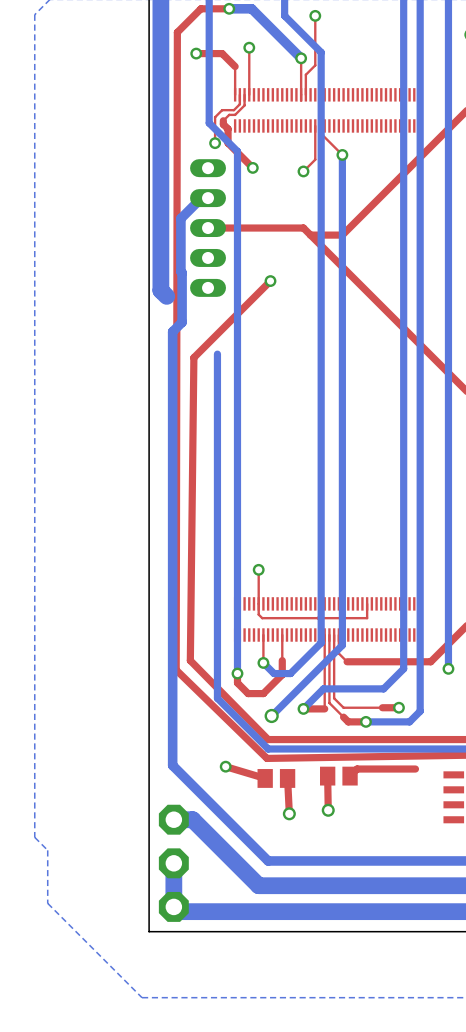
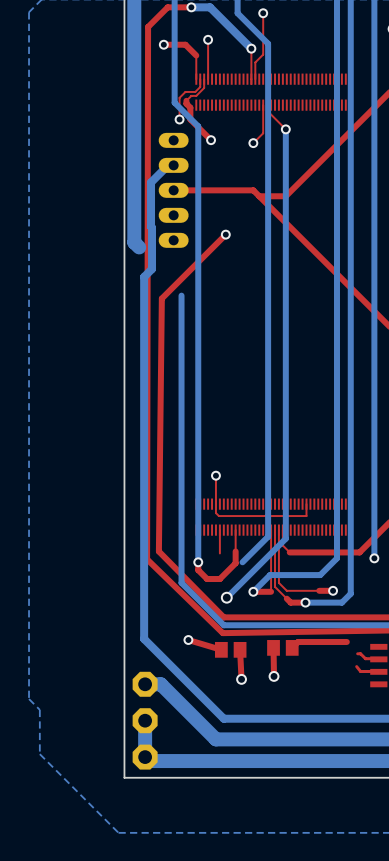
bottom track: (263, 662) (274, 673) (290, 673) -> none
via: (263, 662) -> none
top track: none -> (357, 653) (360, 653) (365, 658) (378, 659)
top track: none -> (356, 666) (360, 671) (378, 671)

